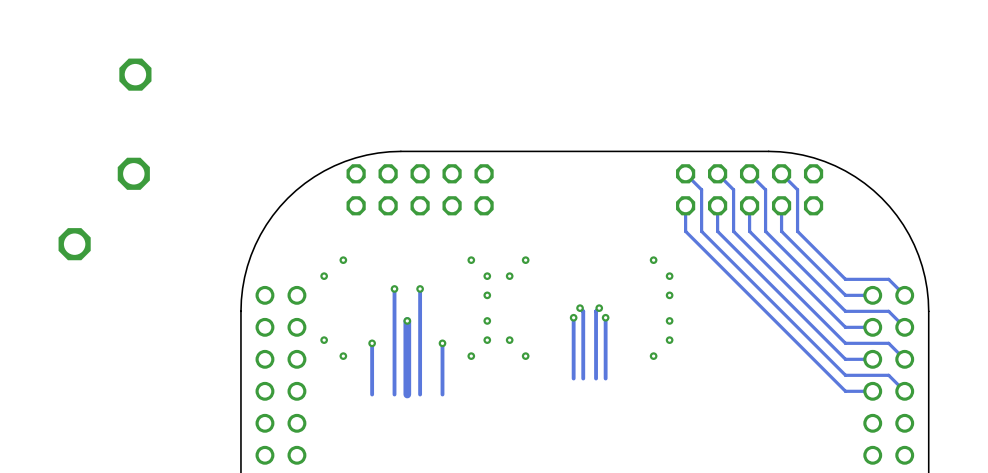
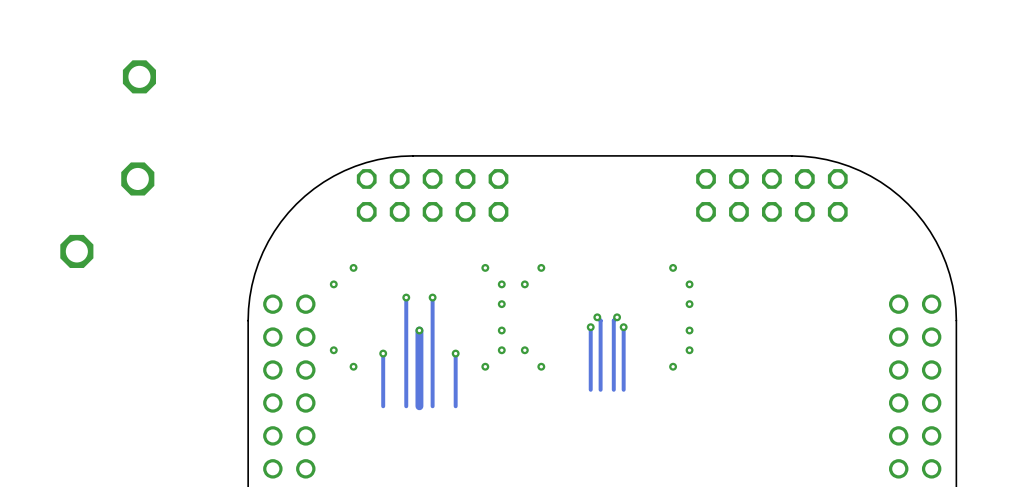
track: (685, 173) (701, 189) (701, 231) (845, 375) (888, 375) (904, 391) -> none
track: (717, 173) (733, 189) (733, 231) (845, 343) (888, 343) (904, 359) -> none
track: (749, 173) (765, 189) (765, 231) (845, 311) (888, 311) (904, 327) -> none
track: (781, 173) (797, 189) (797, 231) (845, 279) (888, 279) (904, 295) -> none
track: (685, 205) (685, 231) (845, 391) (872, 391) -> none
track: (717, 205) (717, 231) (845, 359) (872, 359) -> none
track: (749, 205) (749, 231) (845, 327) (872, 327) -> none
track: (781, 205) (781, 231) (845, 295) (872, 295) -> none

